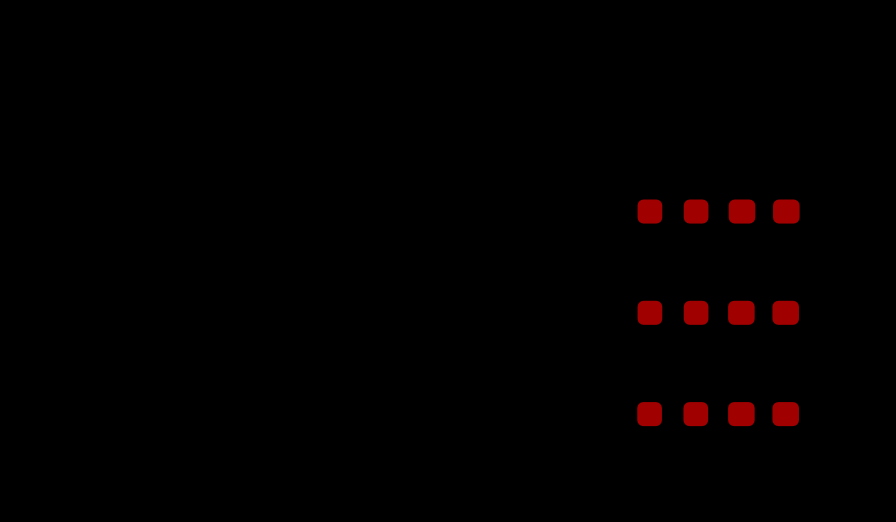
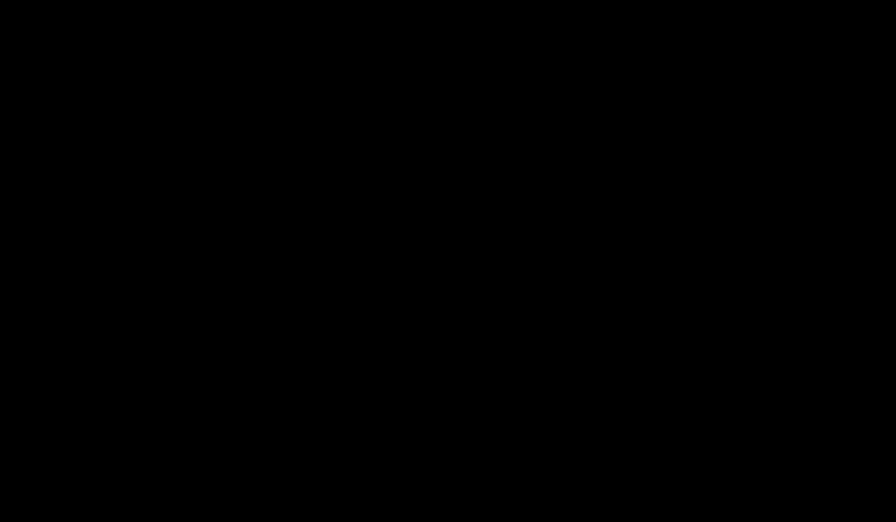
part: (673, 211) -> none
part: (764, 211) -> none
part: (673, 312) -> none
part: (763, 312) -> none
part: (672, 414) -> none
part: (763, 414) -> none

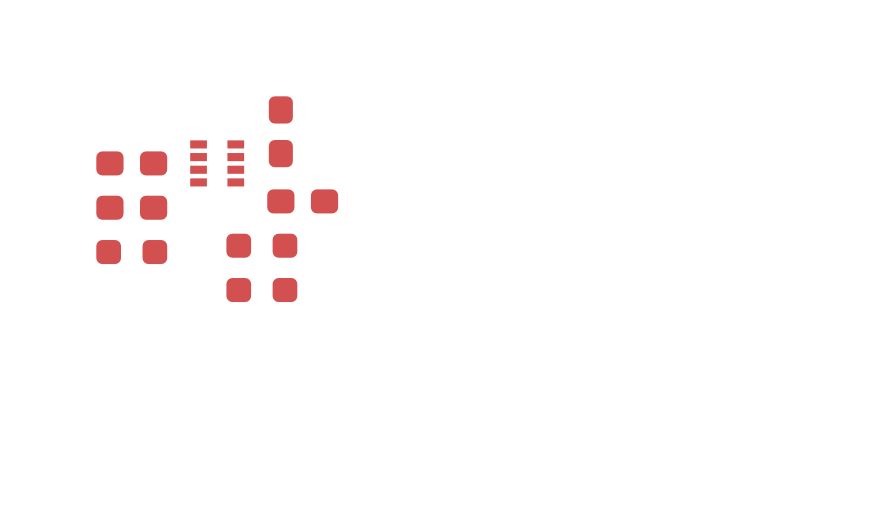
part: none -> (280, 131)
part: none -> (131, 163)
part: none -> (217, 163)
part: none -> (302, 201)
part: none -> (131, 207)
part: none -> (261, 245)
part: none -> (131, 252)
part: none -> (261, 290)

